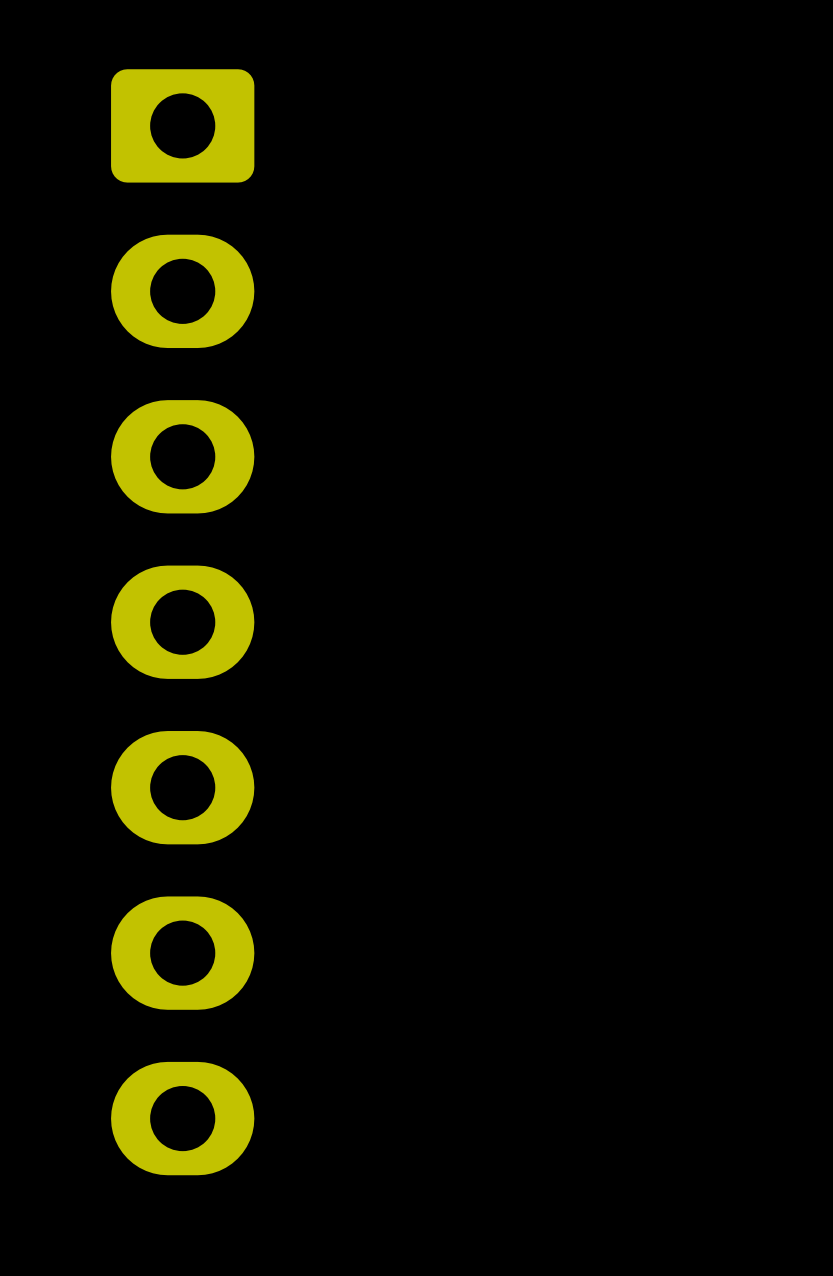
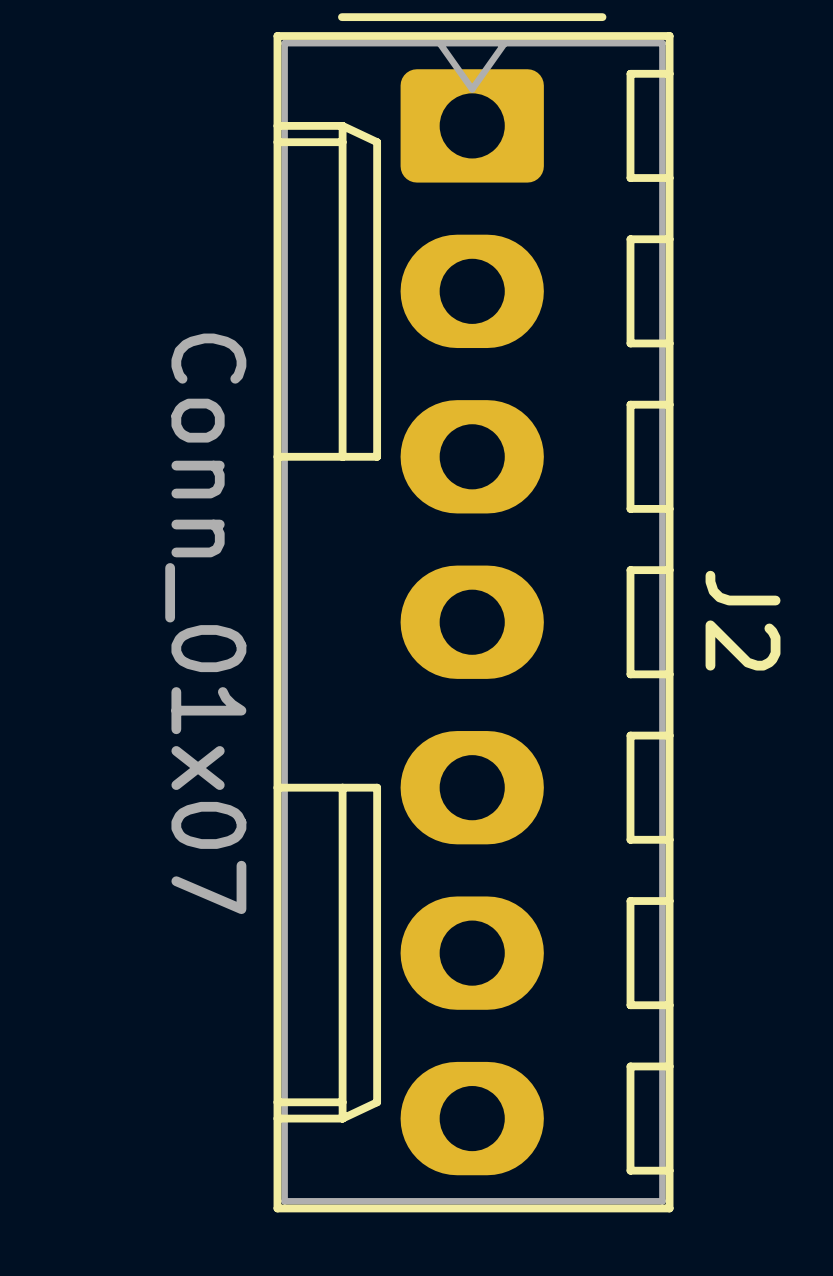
J2 side: top (182, 622) -> bottom (473, 612)

